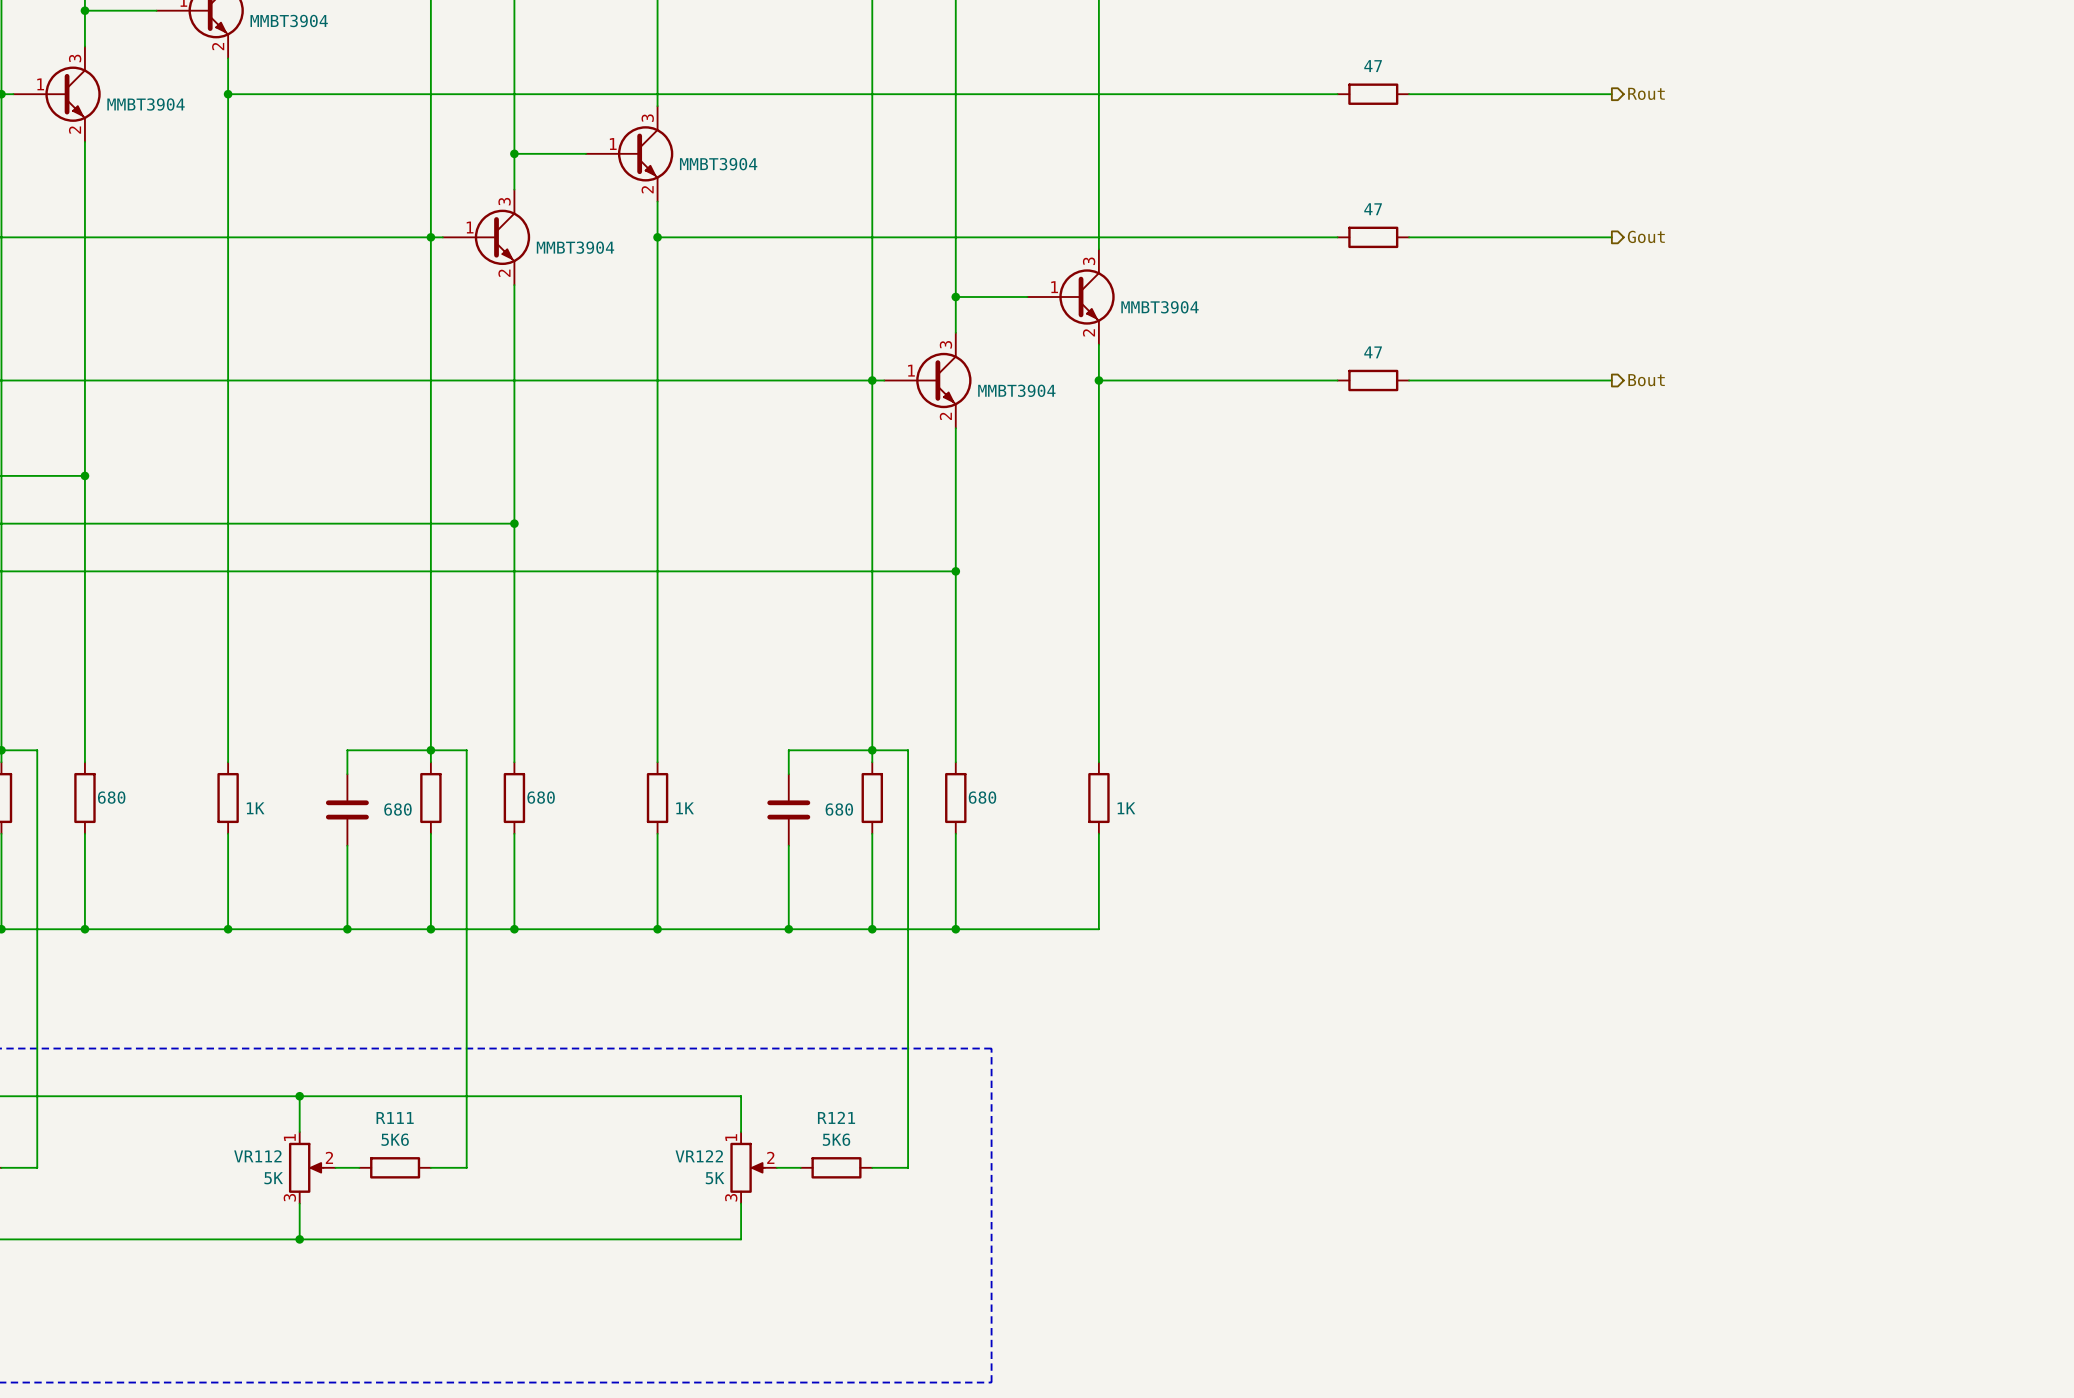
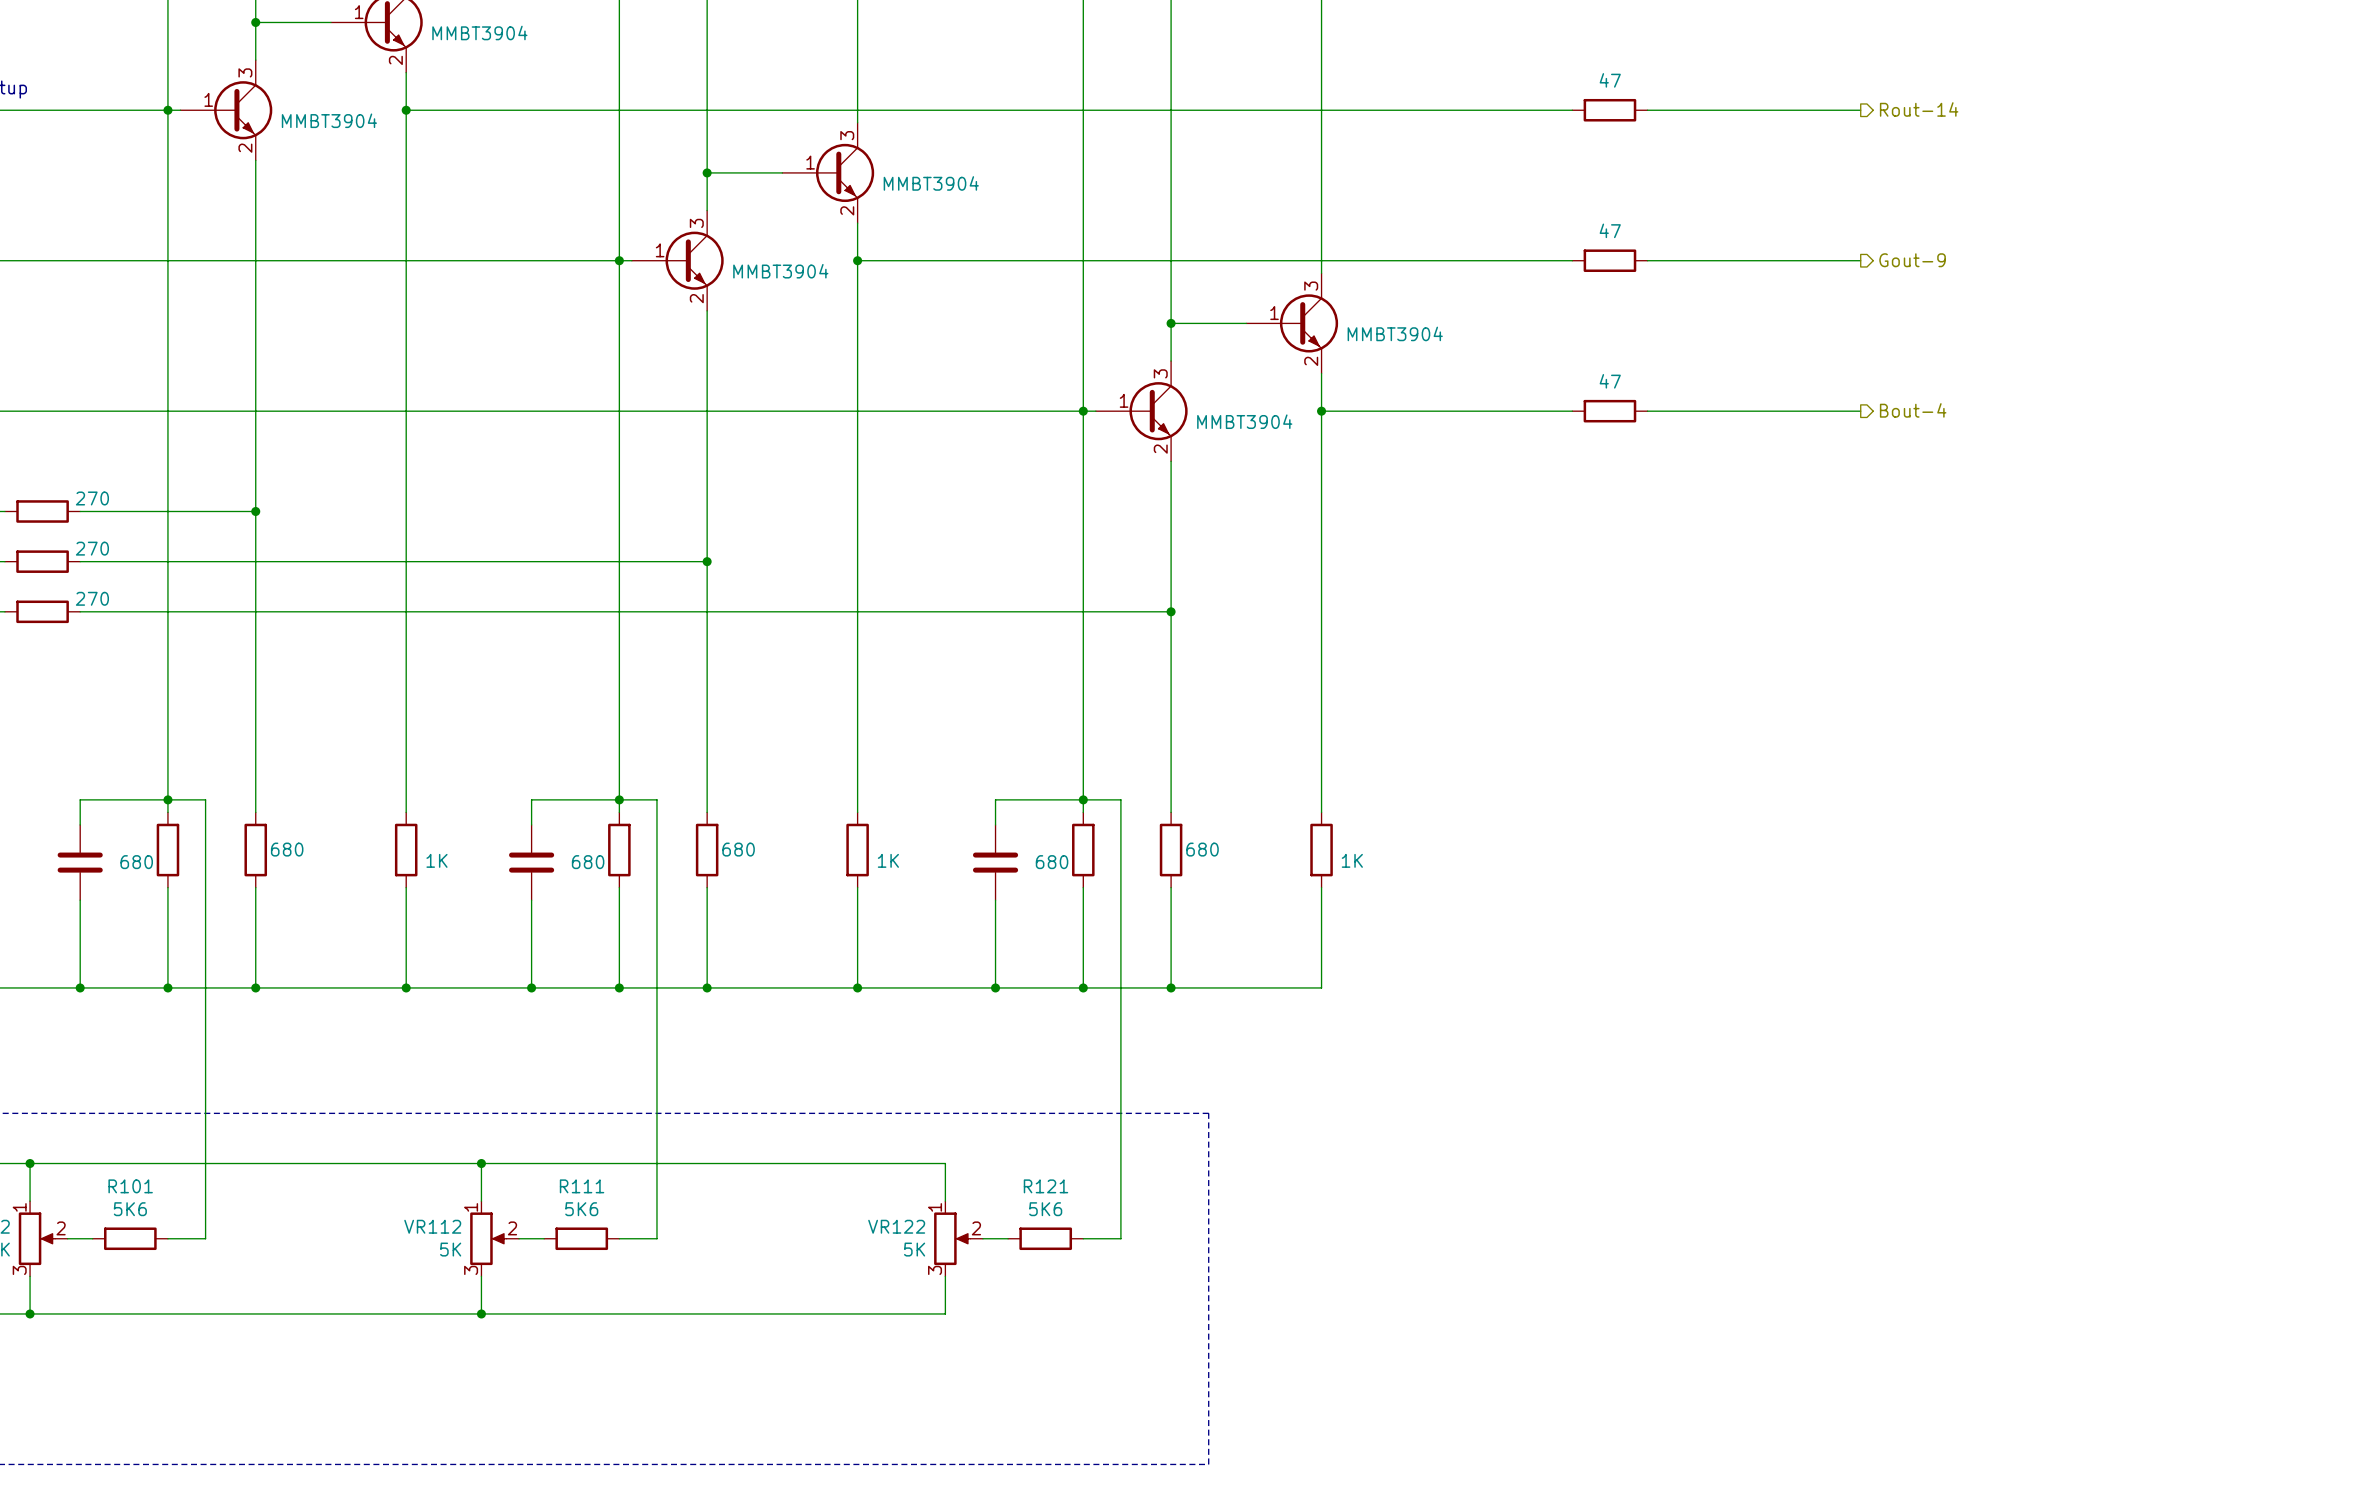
hierarchical label: Rout (1646, 93) -> Rout-14 (1919, 109)
hierarchical label: Gout (1646, 236) -> Gout-9 (1912, 260)
hierarchical label: Bout (1646, 380) -> Bout-4 (1913, 410)

